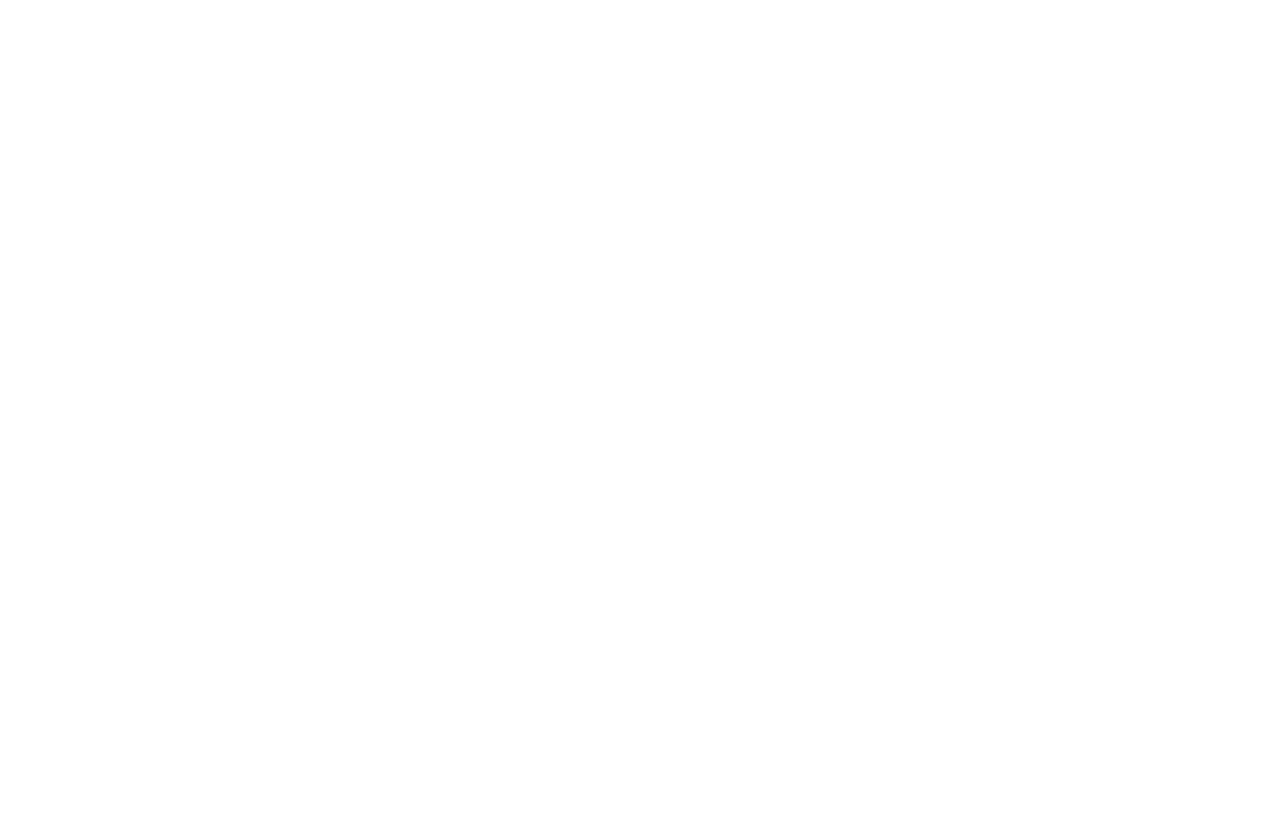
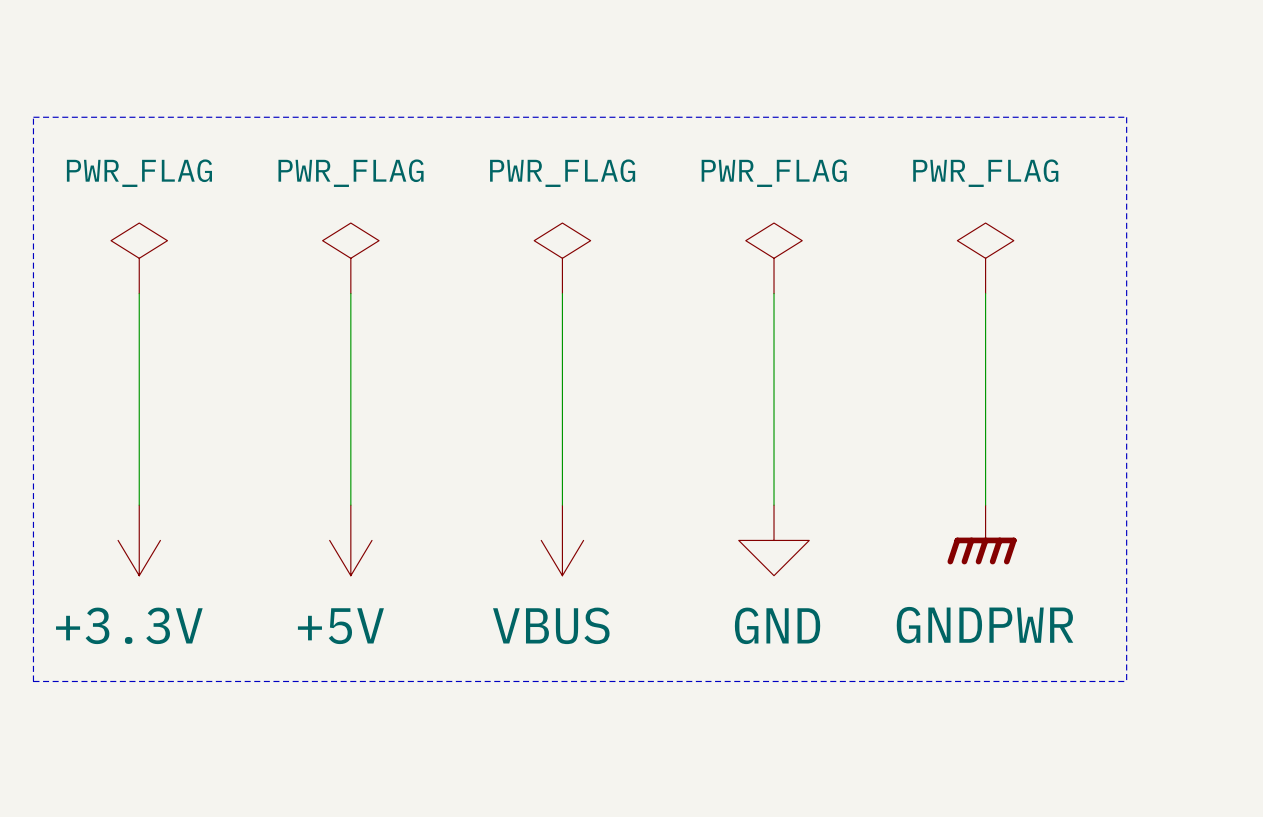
line: none -> (33, 117) (33, 681) (1126, 681) (1126, 117) (33, 117)
power symbol: none -> PWR_FLAG (139, 258)
power symbol: none -> PWR_FLAG (350, 258)
power symbol: none -> PWR_FLAG (562, 258)
power symbol: none -> PWR_FLAG (774, 258)
power symbol: none -> PWR_FLAG (985, 258)
wire: none -> (139, 293) (139, 505)
wire: none -> (350, 293) (350, 505)
wire: none -> (562, 293) (562, 505)
wire: none -> (774, 293) (774, 505)
wire: none -> (985, 293) (985, 505)
power symbol: none -> GNDPWR (982, 534)
power symbol: none -> +3.3V (139, 540)
power symbol: none -> +5V (350, 540)
power symbol: none -> VBUS (562, 540)
power symbol: none -> GND (774, 540)

